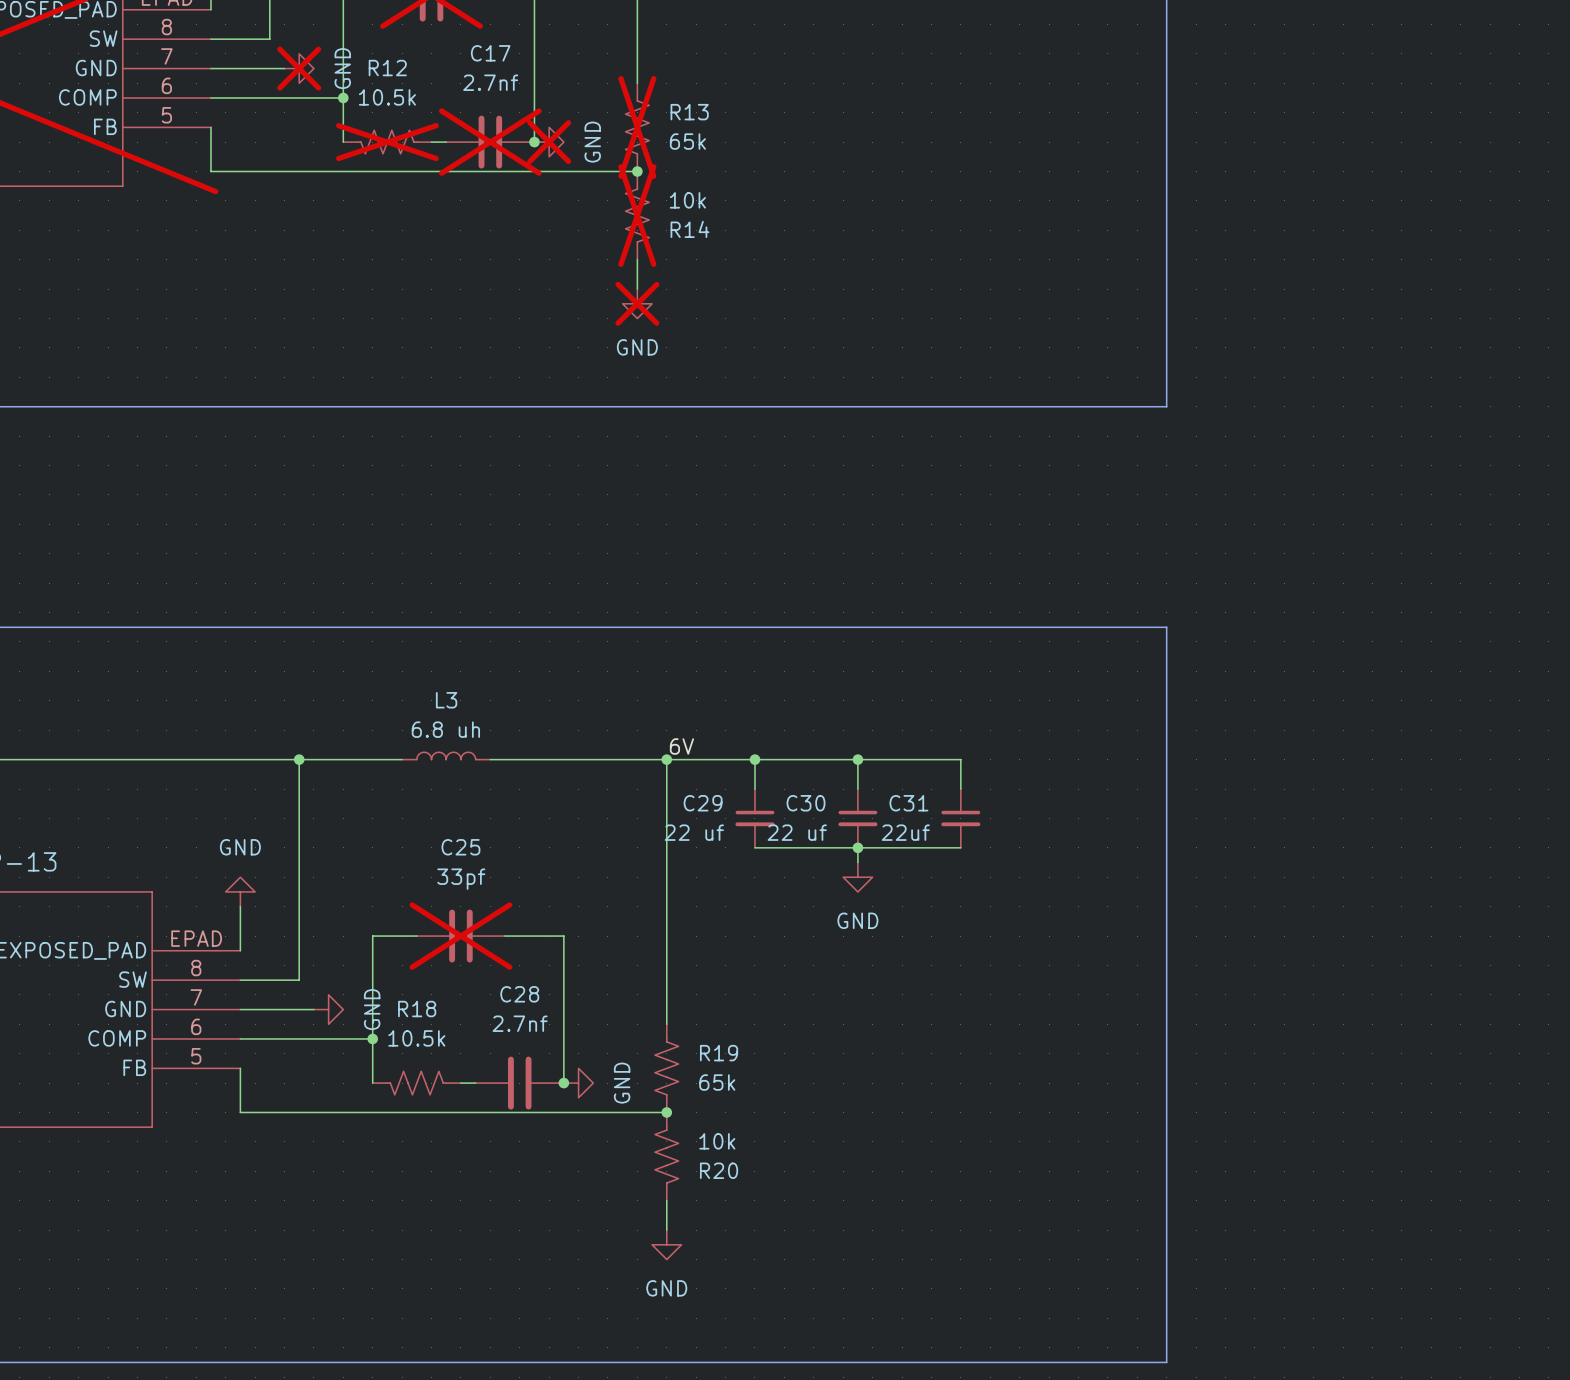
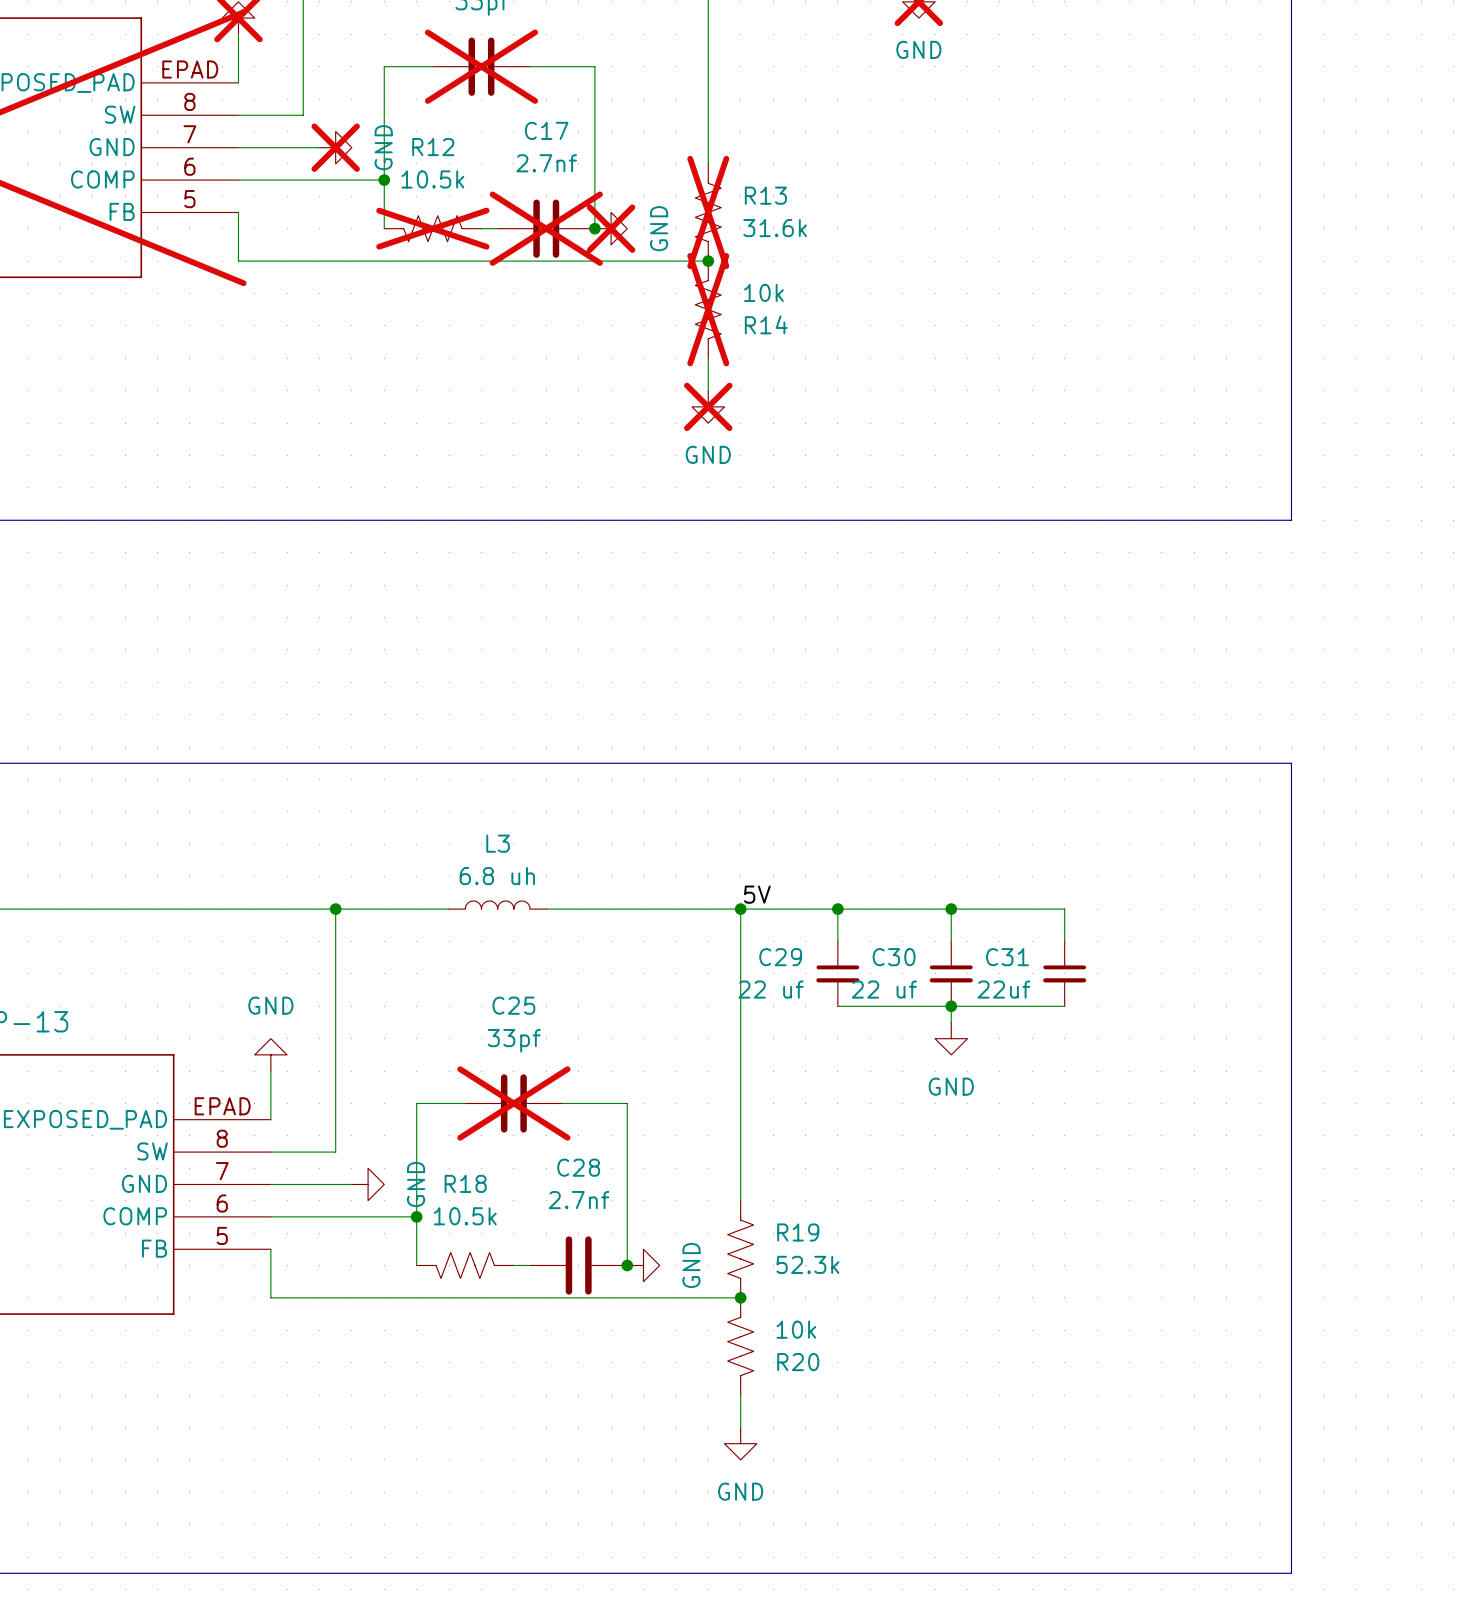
R13 value: 65k (687, 141) -> 31.6k (775, 228)
label: 6V (681, 746) -> 5V (757, 894)
R19 value: 65k (717, 1082) -> 52.3k (807, 1264)

